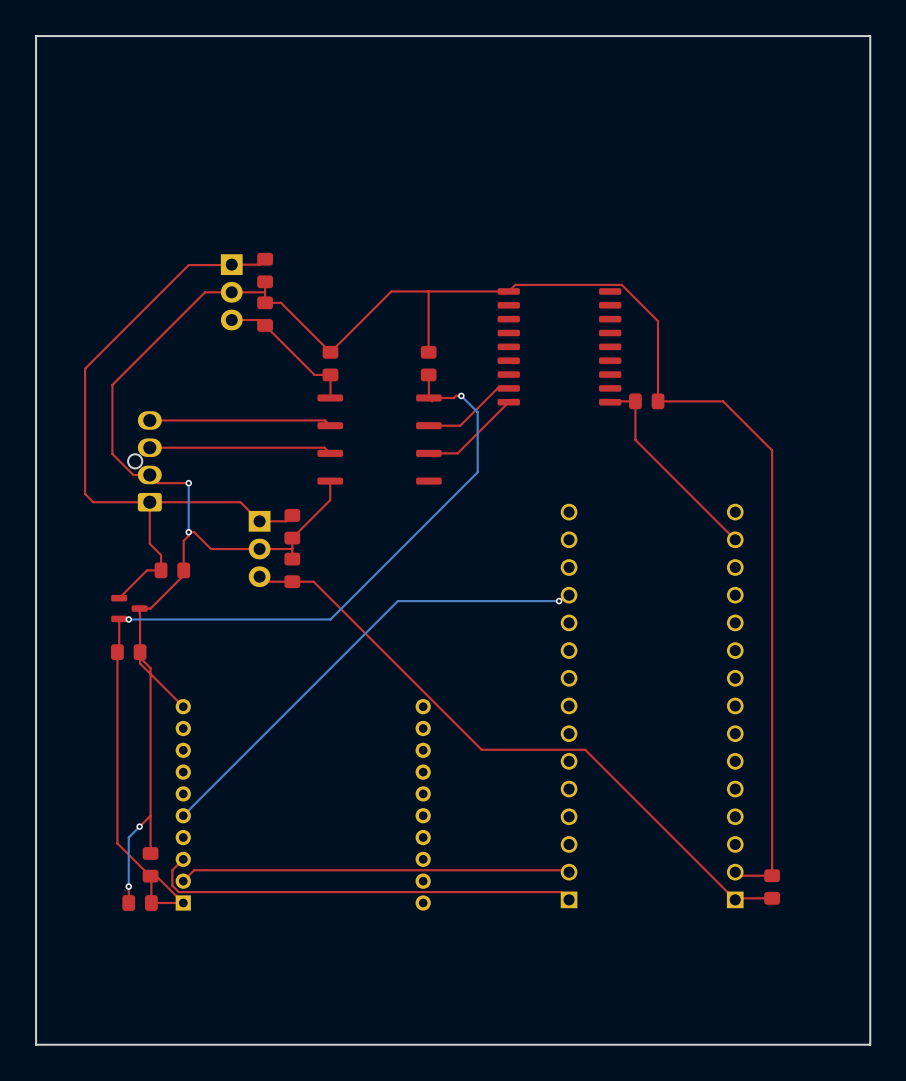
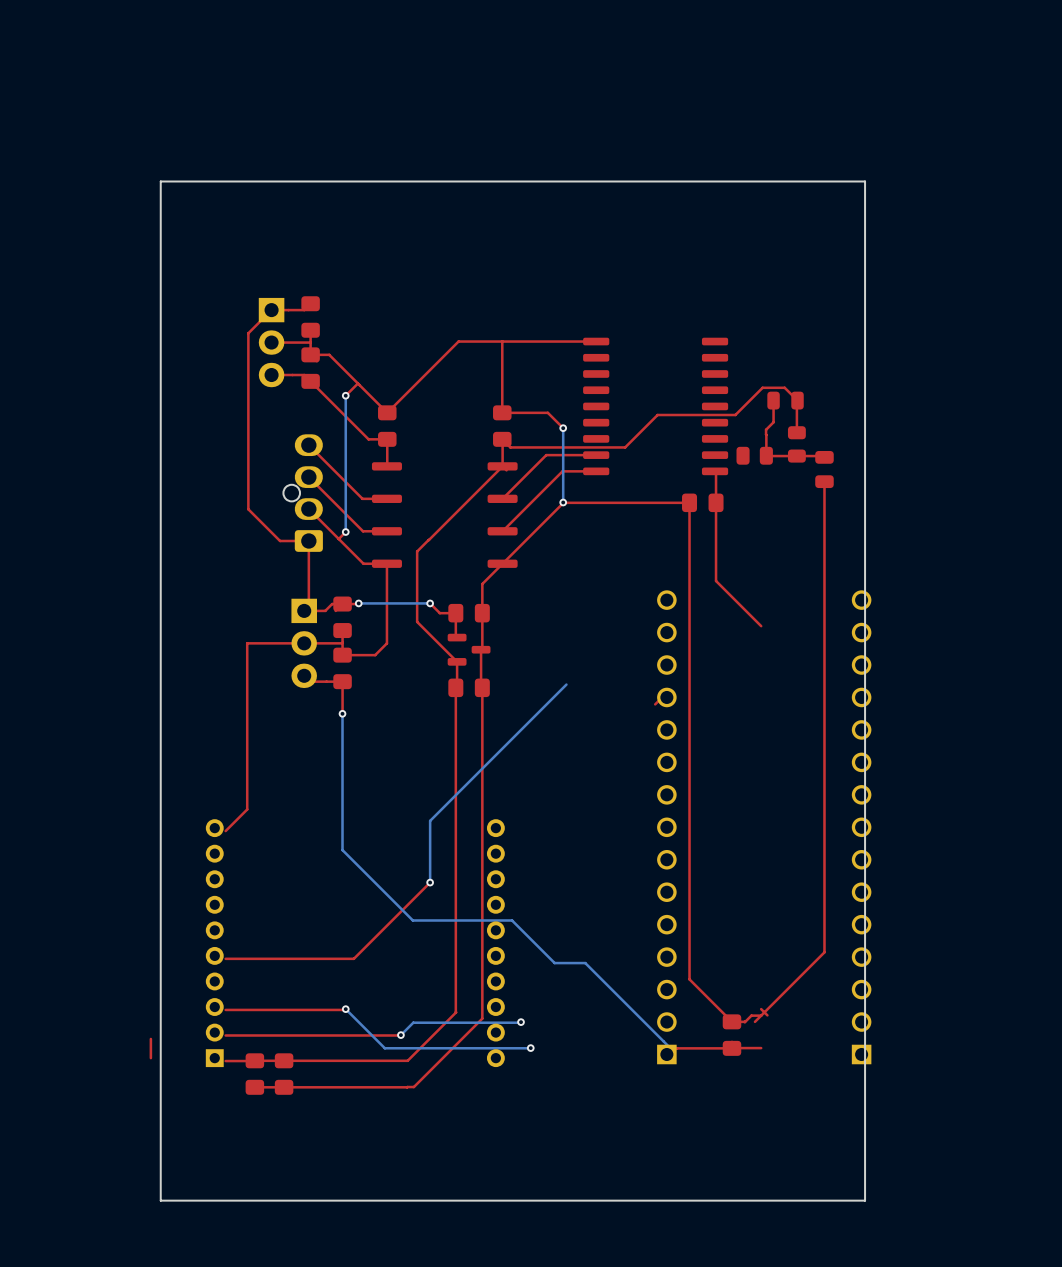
board edge: (870, 36) (36, 36) (36, 1044) (870, 1044) (870, 36) -> (865, 181) (865, 1200) (160, 1200) (160, 181) (865, 181)
top track: none -> (271, 310) (248, 333) (248, 509) (280, 541) (308, 541) (308, 606)
top track: (226, 265) (188, 265) (85, 368) (85, 494) (93, 502) (240, 502) (259, 521) -> none
top track: (508, 291) (515, 284) (621, 284) (658, 321) (658, 401) (723, 401) (772, 450) (772, 875) (738, 875) (735, 872) -> none
top track: (231, 292) (205, 292) (112, 385) (112, 453) (133, 474) (149, 474) (157, 483) (188, 483) -> none
top track: none -> (357, 383) (345, 395)
bottom track: none -> (345, 395) (345, 532)
via: none -> (345, 395)
top track: none -> (773, 400) (773, 422) (766, 429) (766, 455) (824, 457)
part: none -> (785, 400)
top track: none -> (502, 412) (547, 412) (563, 428)
bottom track: none -> (563, 428) (563, 502)
via: none -> (563, 428)
top track: none -> (796, 432) (797, 400) (784, 387) (762, 387) (735, 415) (657, 415) (625, 447) (510, 447) (502, 439)
part: none -> (796, 444)
top track: (497, 388) (460, 425) (428, 425) -> (583, 455) (546, 455) (502, 498)
part: none -> (754, 455)
top track: (461, 395) (453, 397) (428, 397) -> (225, 1061) (407, 1060) (456, 1012) (457, 661) (417, 621) (417, 551) (502, 466)
bottom track: (461, 395) (477, 412) (477, 472) (330, 619) (128, 619) -> none
via: (461, 395) -> none
part: none -> (824, 469)
top track: (611, 401) (635, 401) (635, 439) (735, 539) -> none
part position: (646, 401) -> (702, 502)
top track: (508, 402) (457, 453) (428, 453) -> (596, 471) (562, 471) (502, 531)
top track: none -> (715, 471) (716, 580) (761, 626)
top track: none -> (824, 481) (824, 952) (754, 1021)
top track: (149, 420) (324, 420) (330, 425) -> (308, 445) (362, 498) (386, 498)
via: none -> (563, 502)
top track: none -> (308, 509) (363, 563) (386, 563)
top track: (149, 447) (324, 447) (330, 453) -> (308, 477) (363, 531) (386, 531)
top track: none -> (345, 532) (338, 538)
via: none -> (345, 532)
part position: (144, 461) -> (303, 493)
bottom track: (188, 483) (188, 532) -> none
via: (188, 483) -> none
top track: (330, 500) (292, 538) -> (386, 586) (386, 643) (375, 655) (342, 655)
top track: (149, 502) (149, 543) (161, 555) (161, 570) (147, 570) (119, 598) -> none
via: none -> (358, 603)
top track: none -> (430, 603) (439, 613) (455, 613) (457, 637)
bottom track: none -> (430, 603) (358, 603)
via: none -> (430, 603)
top track: (286, 521) (277, 521) -> (358, 603) (332, 604) (325, 610)
part: none -> (469, 613)
via: (188, 532) -> none
top track: (210, 549) (194, 532) (188, 532) (188, 535) (183, 540) (183, 575) (150, 608) (139, 608) (140, 663) (183, 706) -> (247, 643) (247, 809) (225, 831)
part: none -> (469, 649)
part: (172, 570) -> none
top track: (292, 581) (313, 581) (481, 749) (585, 749) (735, 899) (772, 898) -> (342, 681) (342, 713)
bottom track: none -> (566, 684) (430, 820) (430, 882)
part: none -> (469, 687)
bottom track: (559, 601) (397, 601) (183, 815) -> none
via: (559, 601) -> none
part: (129, 608) -> none
bottom track: none -> (342, 713) (342, 850) (412, 920) (512, 920) (554, 963) (585, 963) (670, 1048)
via: none -> (342, 713)
top track: (128, 619) (119, 618) (119, 650) (117, 652) (117, 843) (150, 876) -> none
via: (128, 619) -> none
part: (128, 652) -> none
top track: (140, 657) (150, 668) (150, 853) -> none
top track: none -> (430, 882) (353, 958) (225, 958)
via: none -> (430, 882)
top track: (150, 815) (139, 826) -> none
bottom track: (139, 826) (128, 837) (128, 886) -> none
via: (139, 826) -> none
top track: (183, 859) (172, 870) (172, 885) (178, 892) (561, 892) (569, 899) -> none
top track: none -> (345, 1009) (225, 1009)
bottom track: none -> (345, 1009) (384, 1048) (530, 1048)
via: none -> (345, 1009)
top track: none -> (761, 1009) (767, 1015)
part: (150, 864) -> none
top track: none -> (761, 1015) (751, 1015) (744, 1022) (731, 1021) (689, 979) (689, 502) (563, 502) (482, 584) (482, 1018) (413, 1087) (254, 1087)
bottom track: none -> (521, 1022) (413, 1022) (400, 1035)
via: none -> (521, 1022)
top track: (569, 872) (567, 870) (194, 870) (183, 881) -> none
top track: (150, 876) (151, 902) (183, 902) (156, 876) (150, 876) -> none
top track: none -> (400, 1035) (225, 1035)
via: none -> (400, 1035)
via: (128, 886) -> none
part position: (772, 887) -> (731, 1035)
via: none -> (530, 1048)
top track: none -> (761, 1048) (670, 1048)
part: (140, 902) -> none
part: none -> (254, 1074)
part: none -> (284, 1074)

